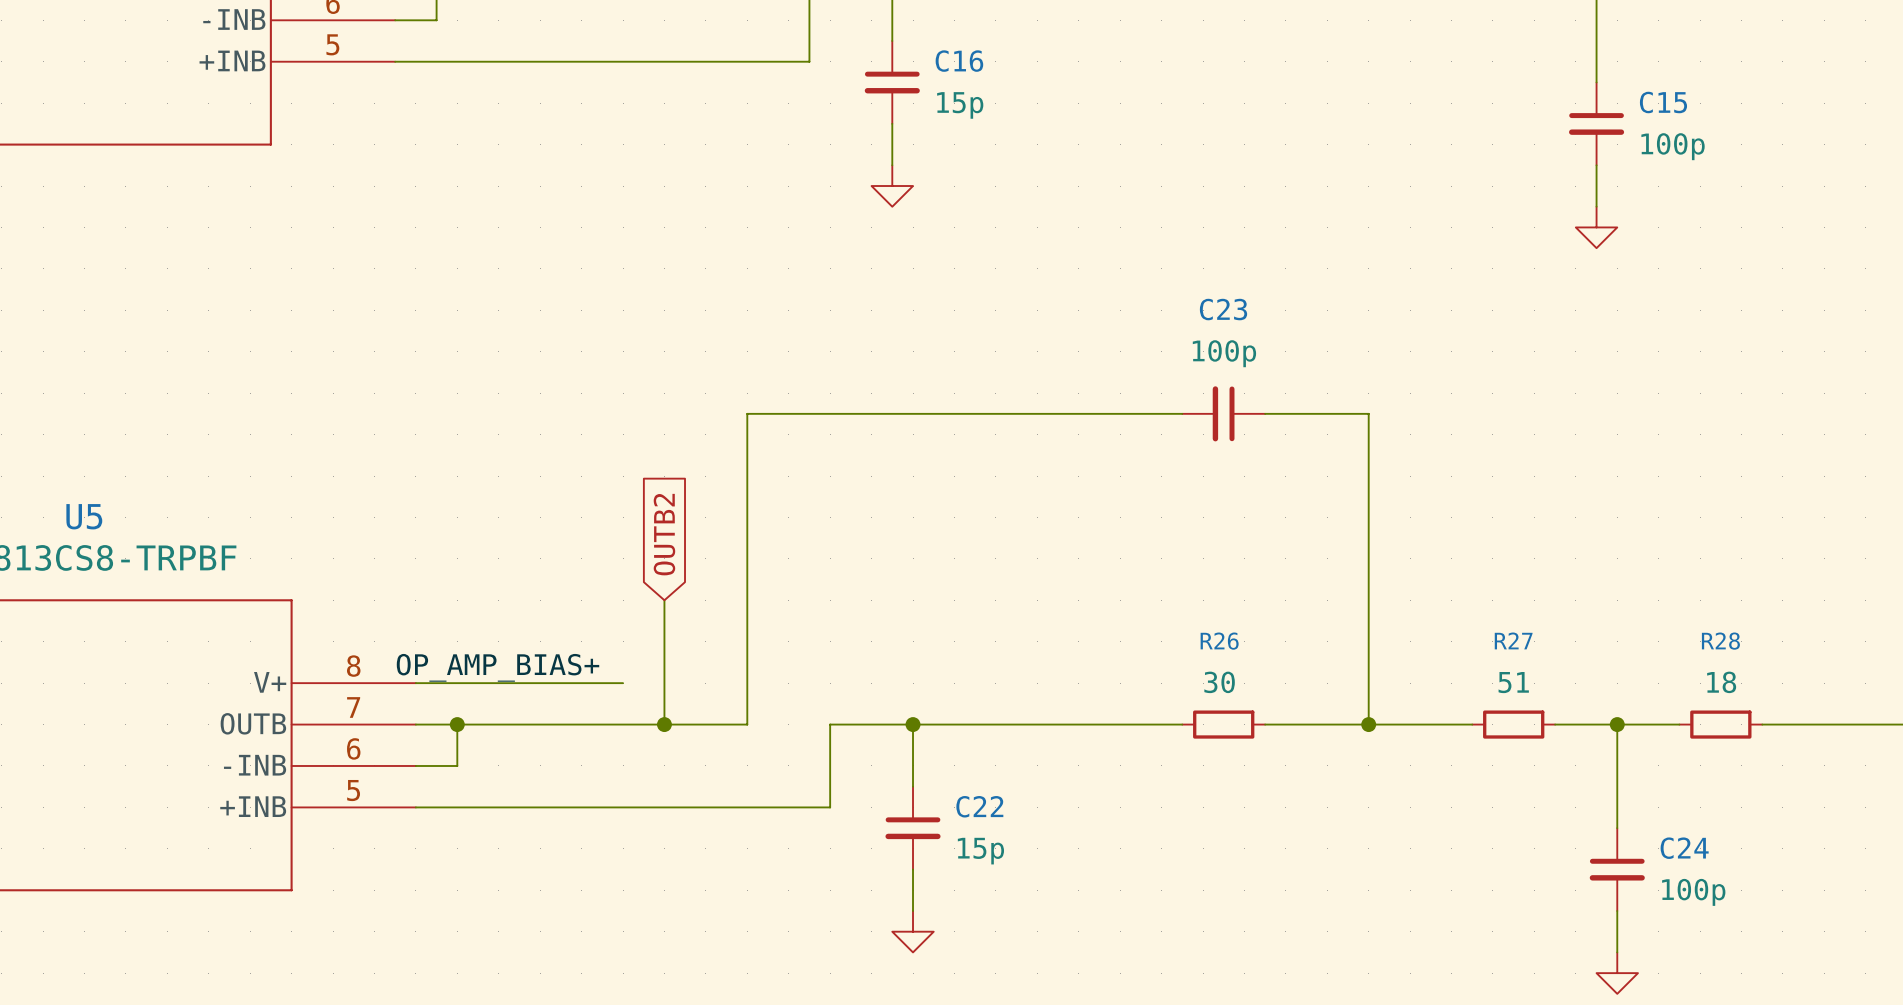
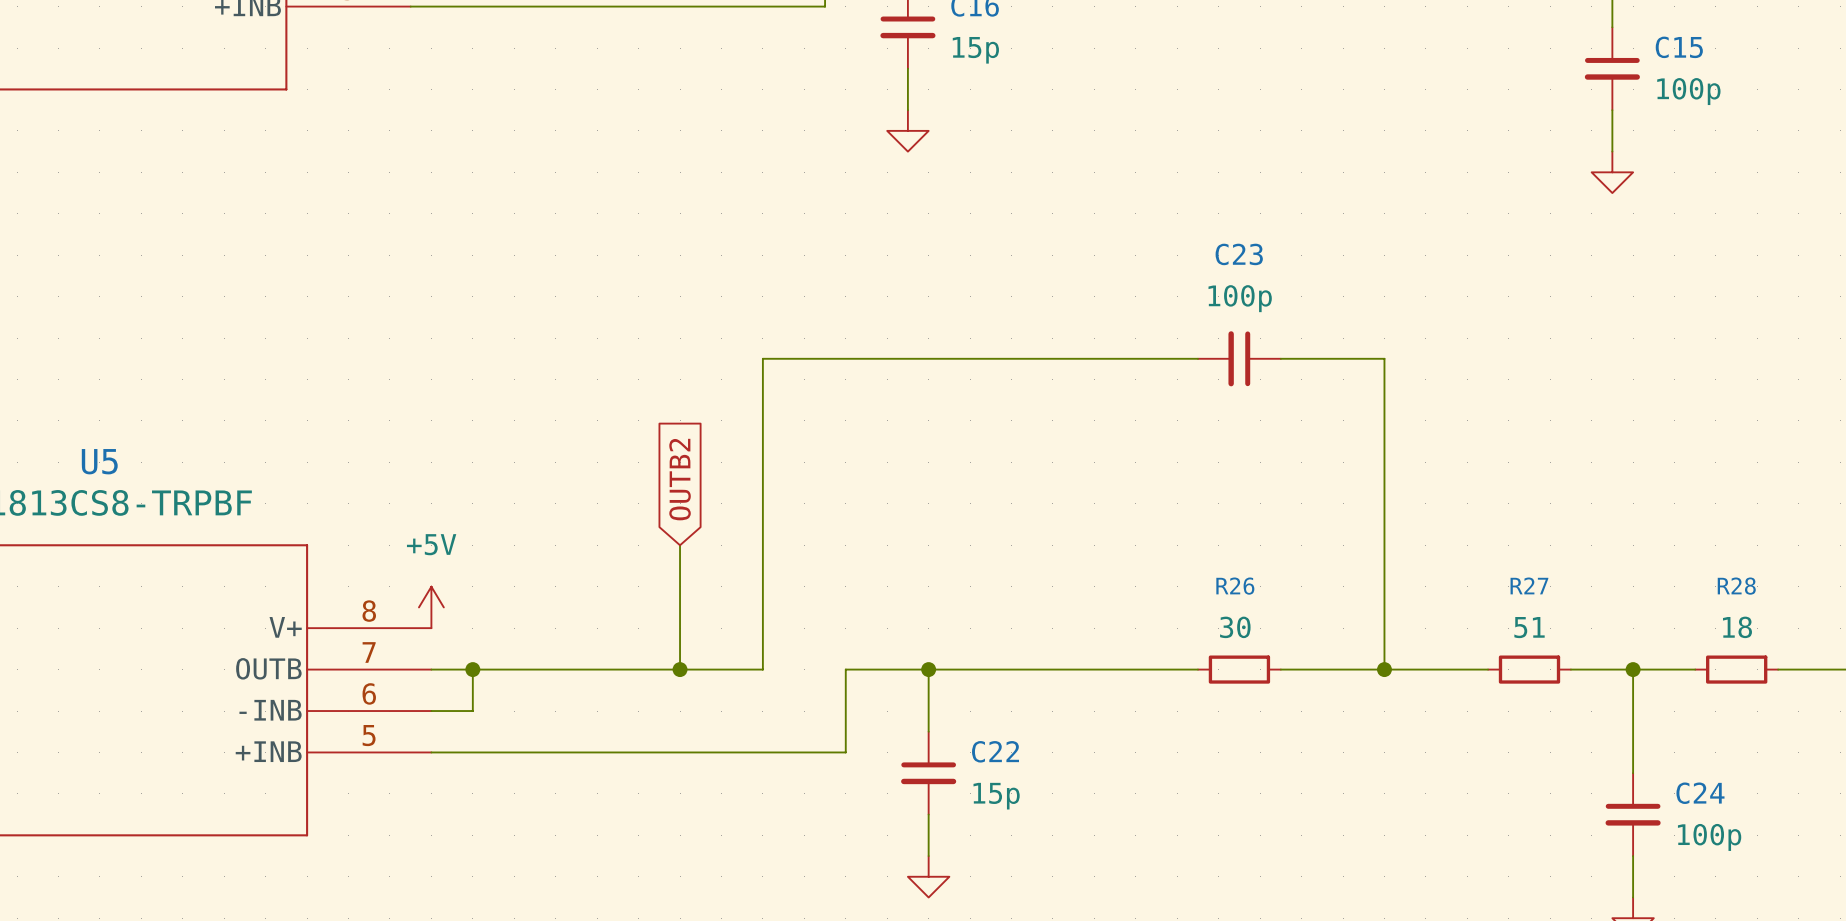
power symbol: none -> +5V (431, 607)
label: OP_AMP_BIAS+ (497, 667) -> none
wire: (415, 683) (623, 683) -> none

